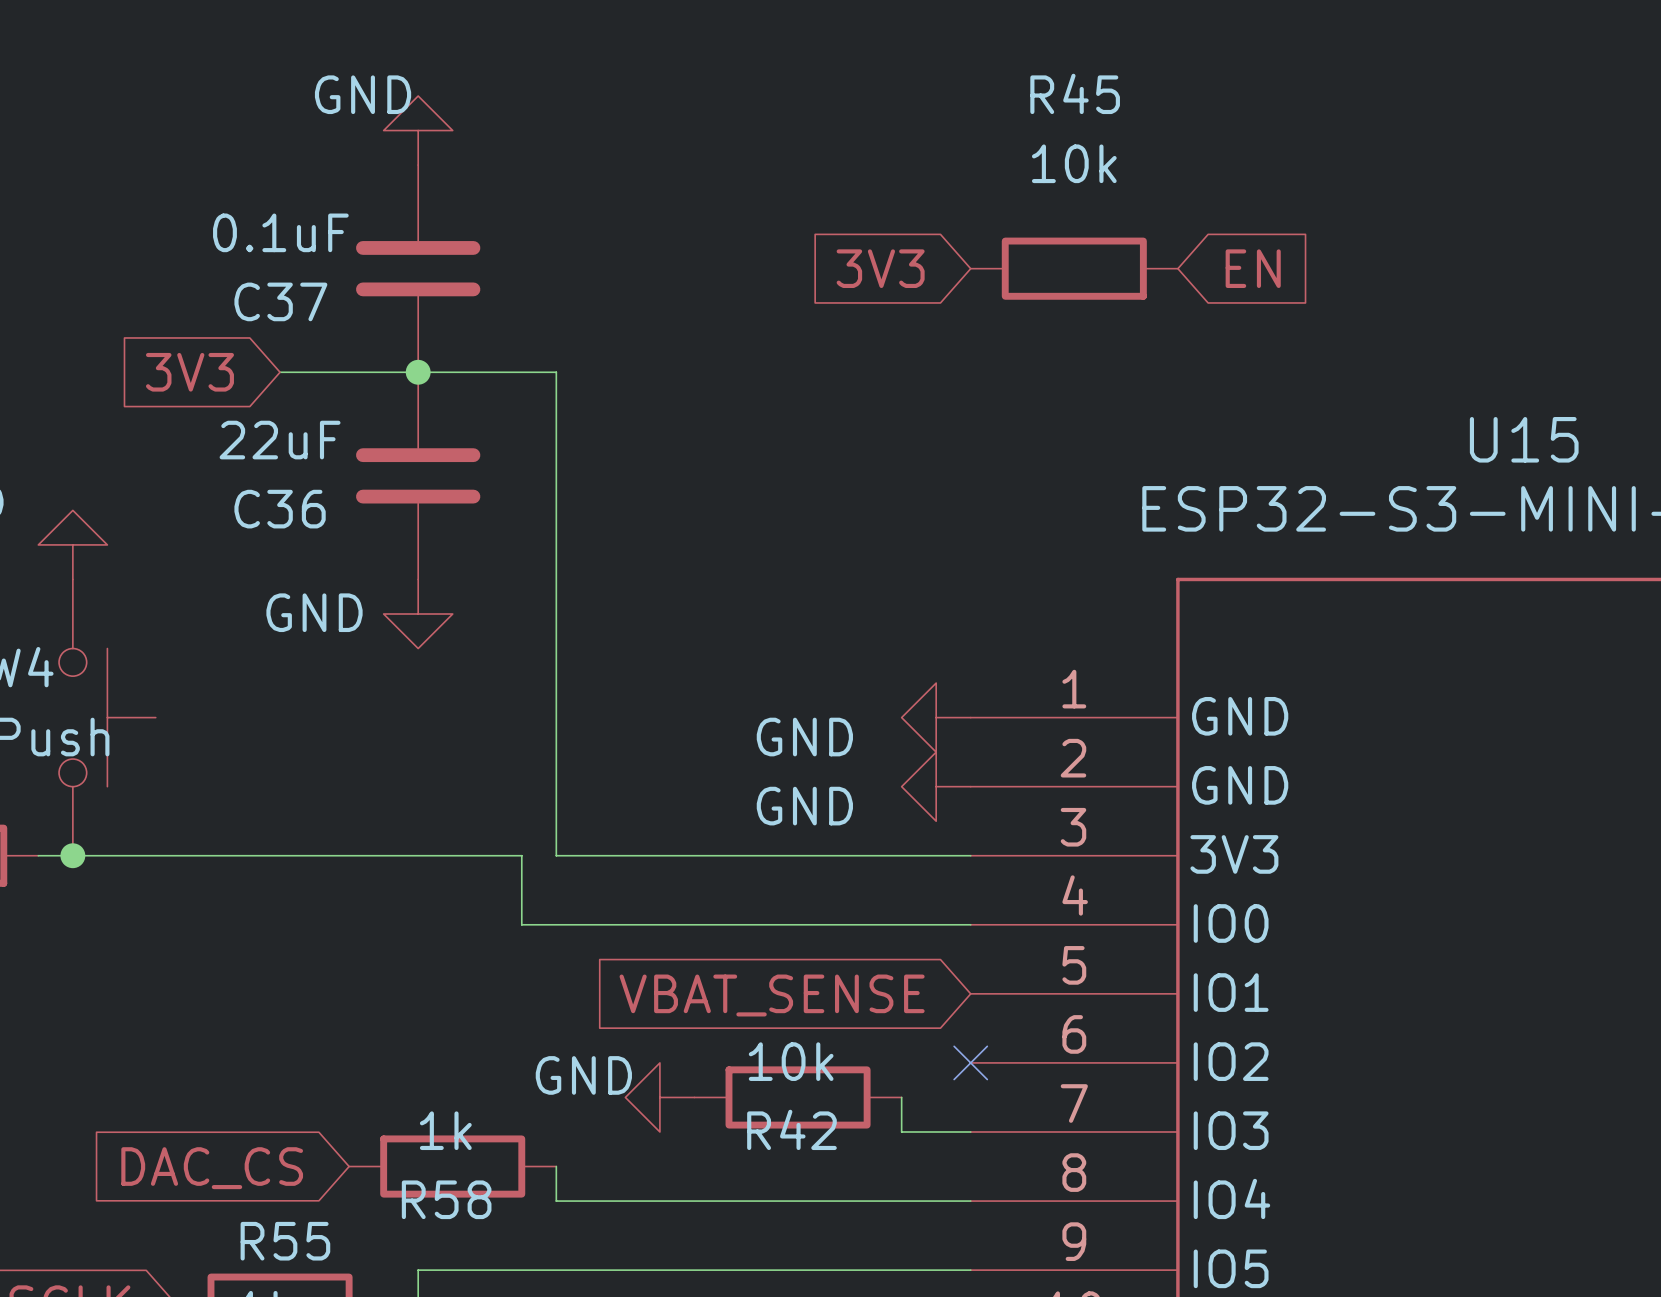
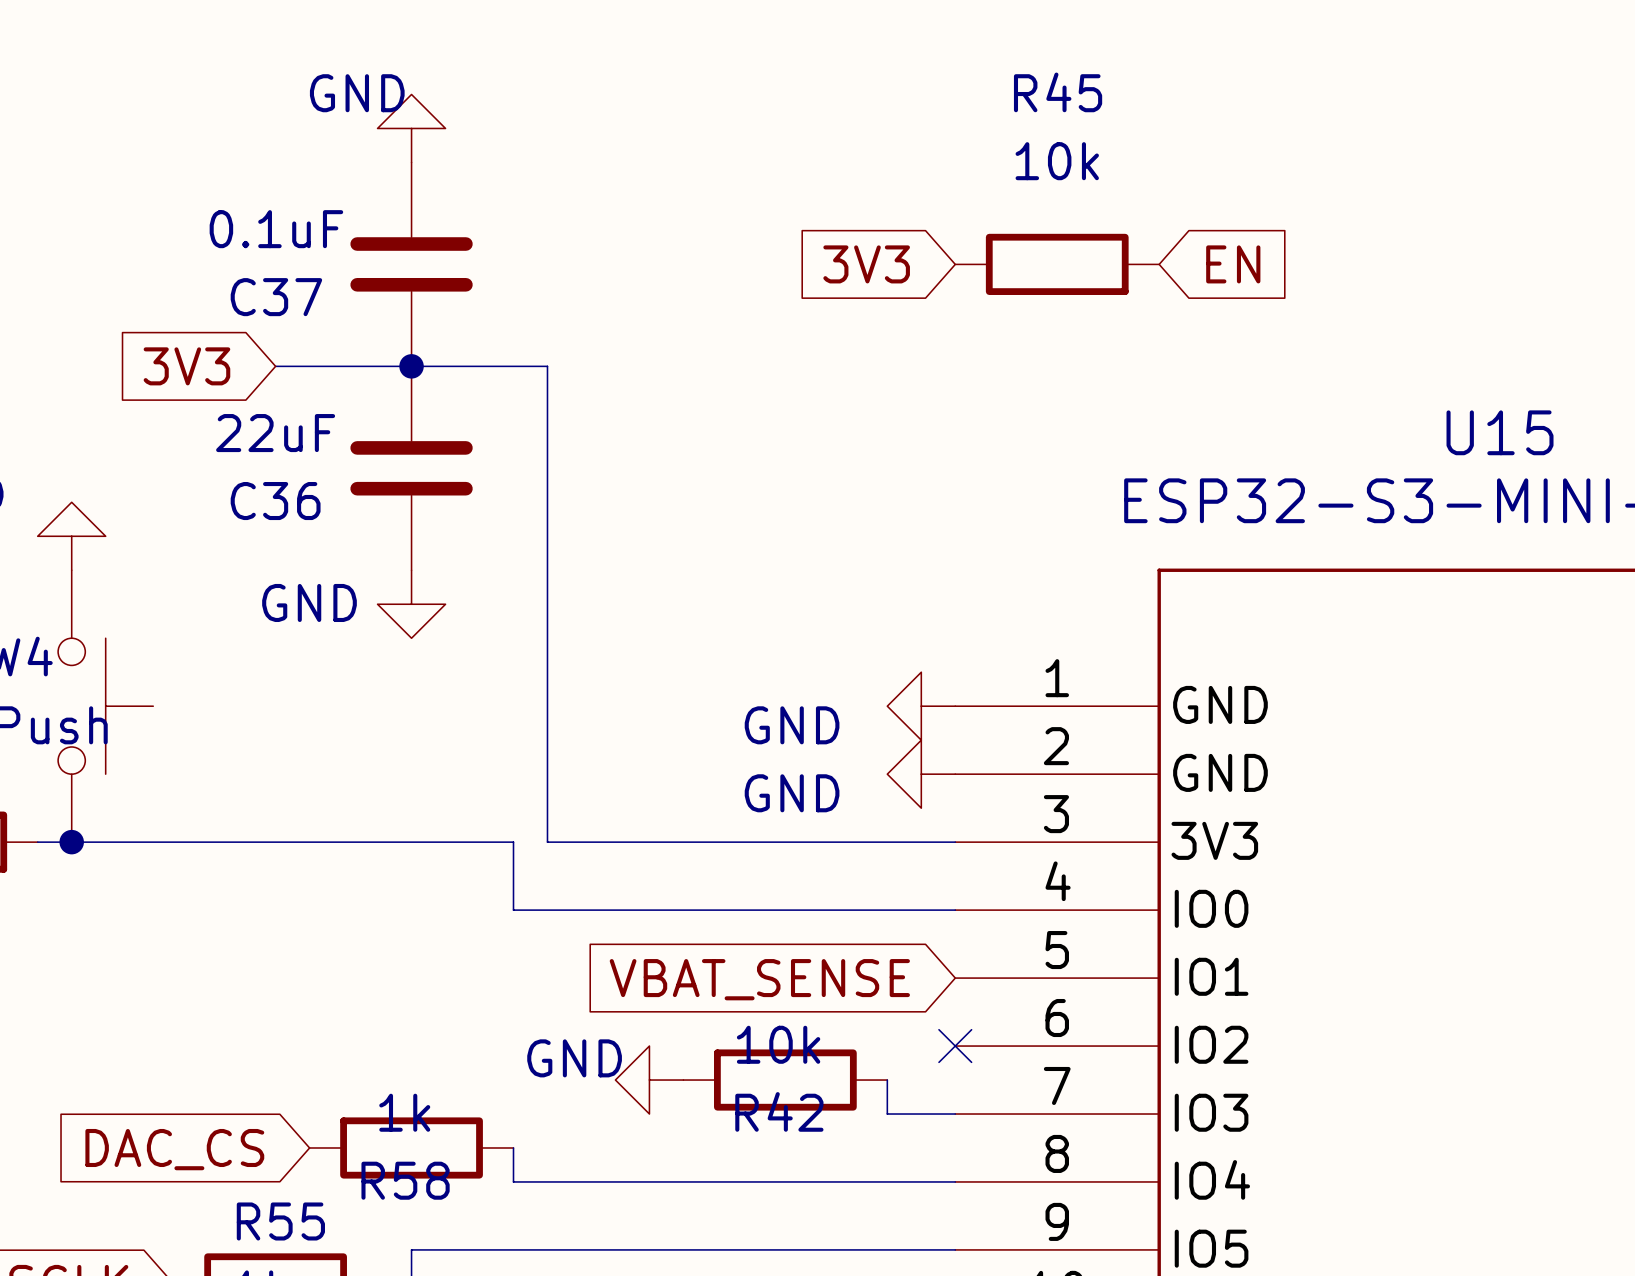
R58 position: (452, 1166) -> (411, 1147)
wire: (556, 1166) (556, 1201) -> (513, 1147) (513, 1181) (547, 1181)
global label position: DAC_CS (212, 1168) -> DAC_CS (174, 1149)

